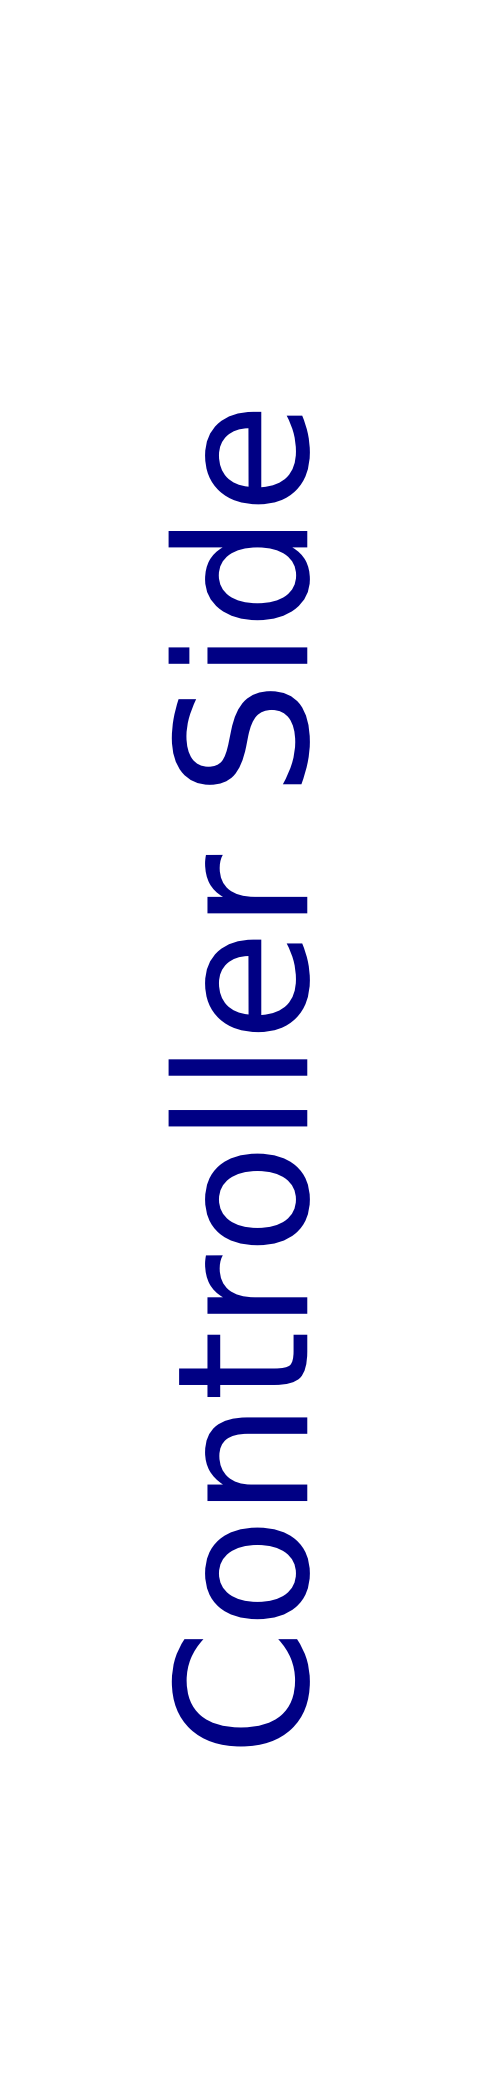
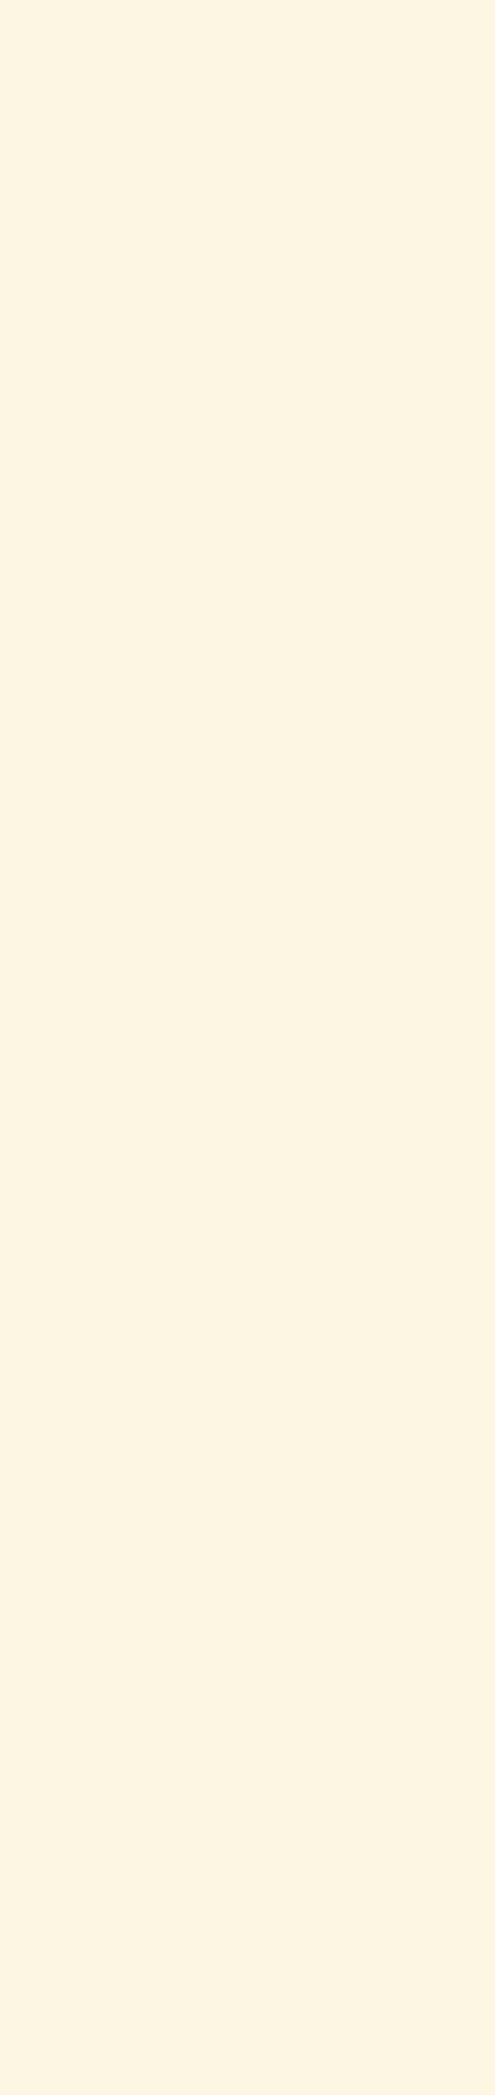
text: Controller Side (239, 1079) -> none

